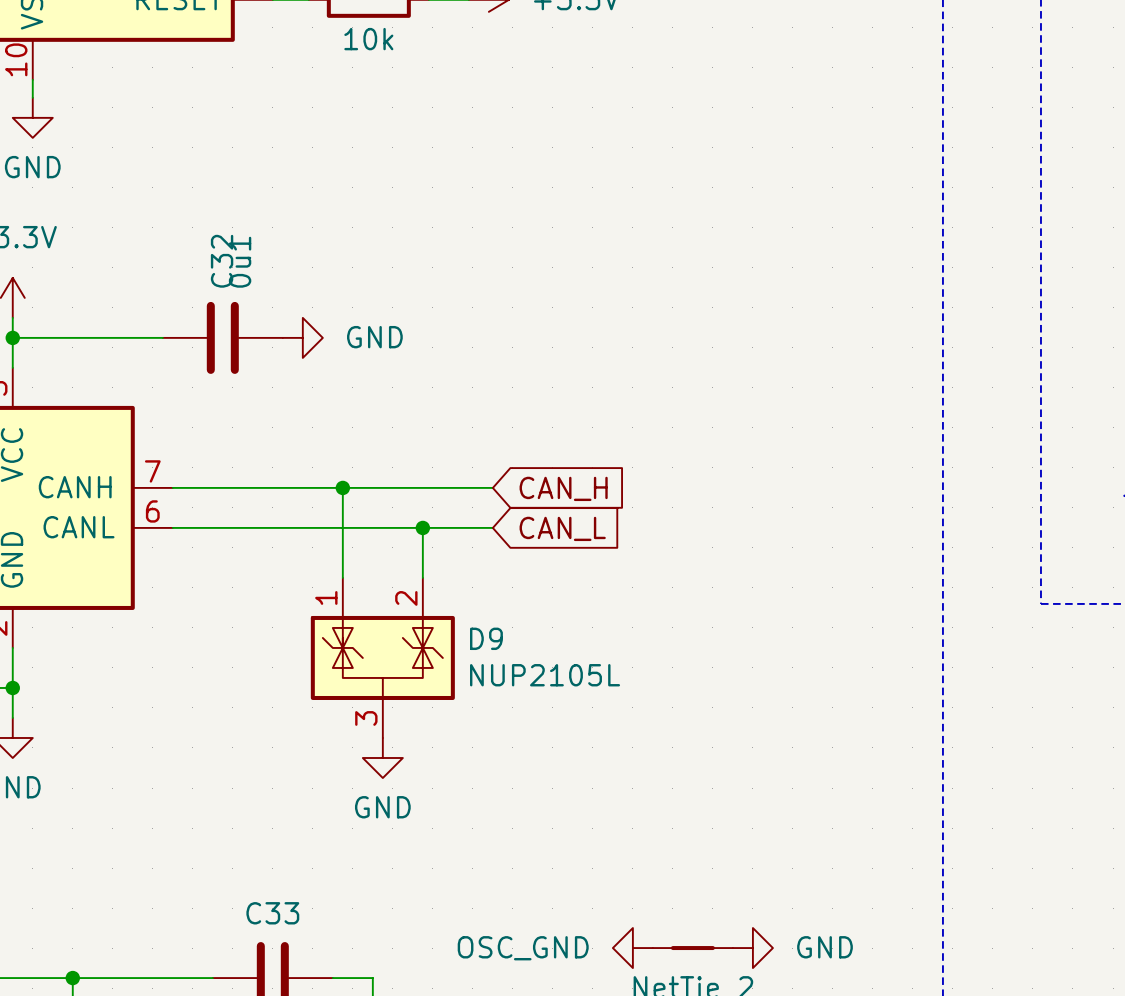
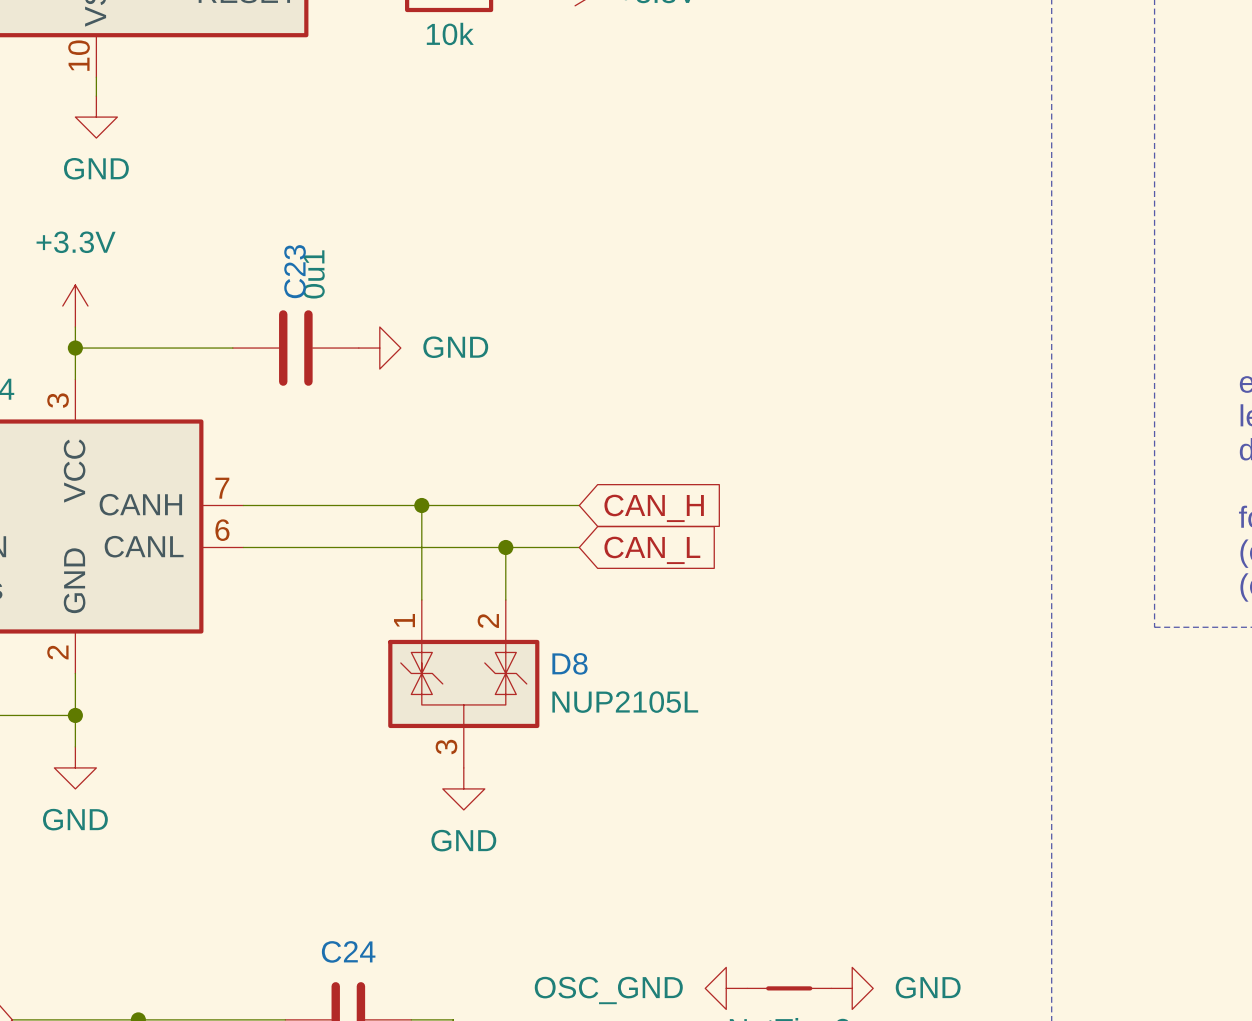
C32 name: C32 (222, 261) -> C23 (295, 271)
D9 name: D9 (486, 638) -> D8 (569, 663)
C33 name: C33 (272, 913) -> C24 (348, 951)

